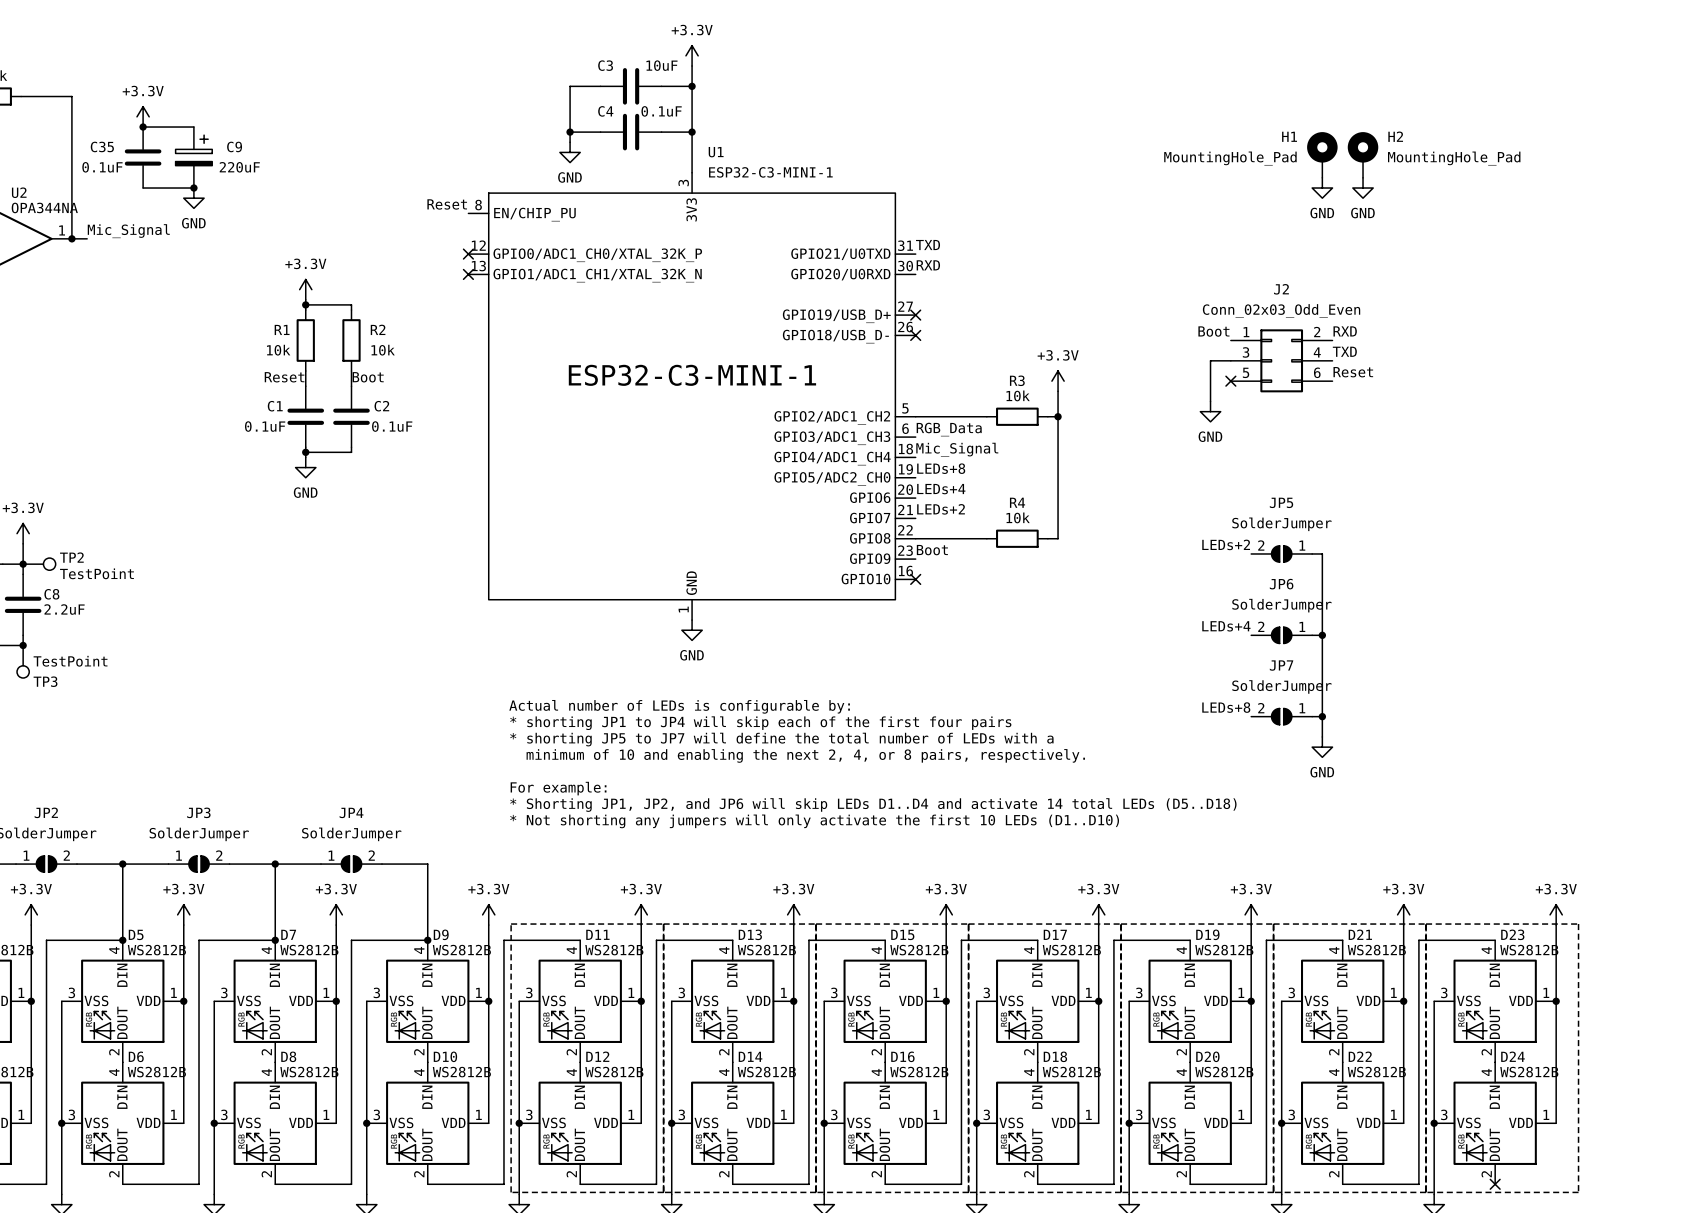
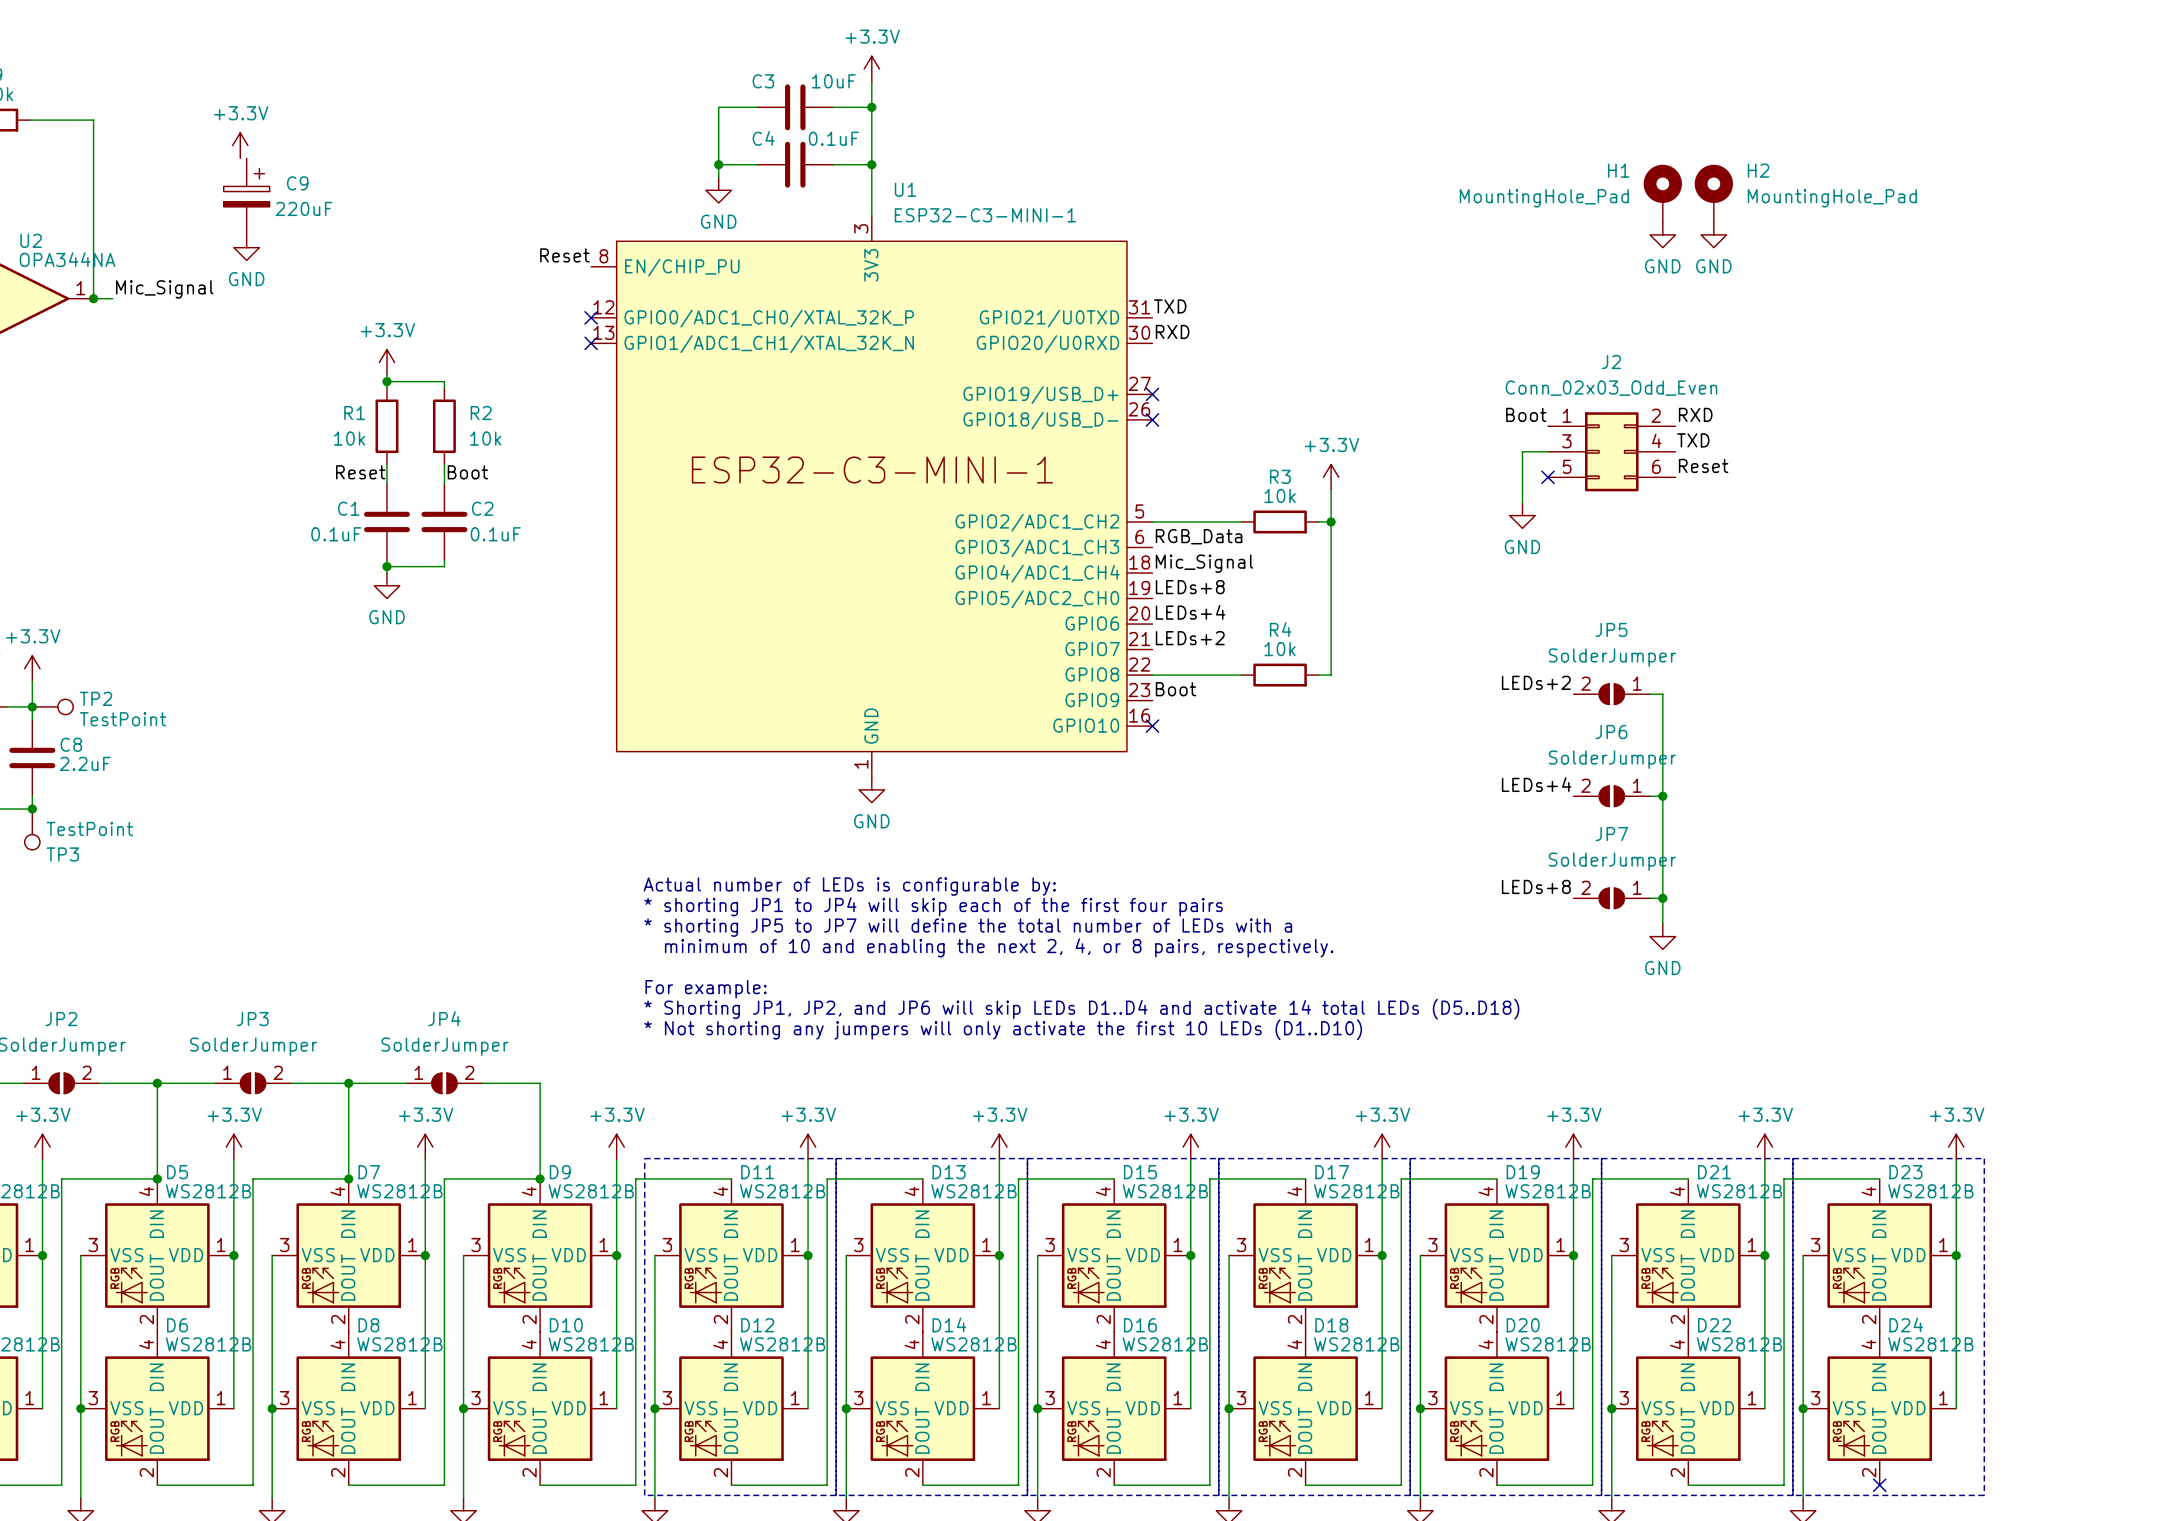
power symbol position: +3.3V (143, 116) -> +3.3V (240, 145)
wire: (143, 127) (193, 127) -> none
junction: (143, 127) -> none
C35: 0.1uF (143, 157) -> none
wire: (143, 188) (193, 188) -> none
junction: (193, 188) -> none

